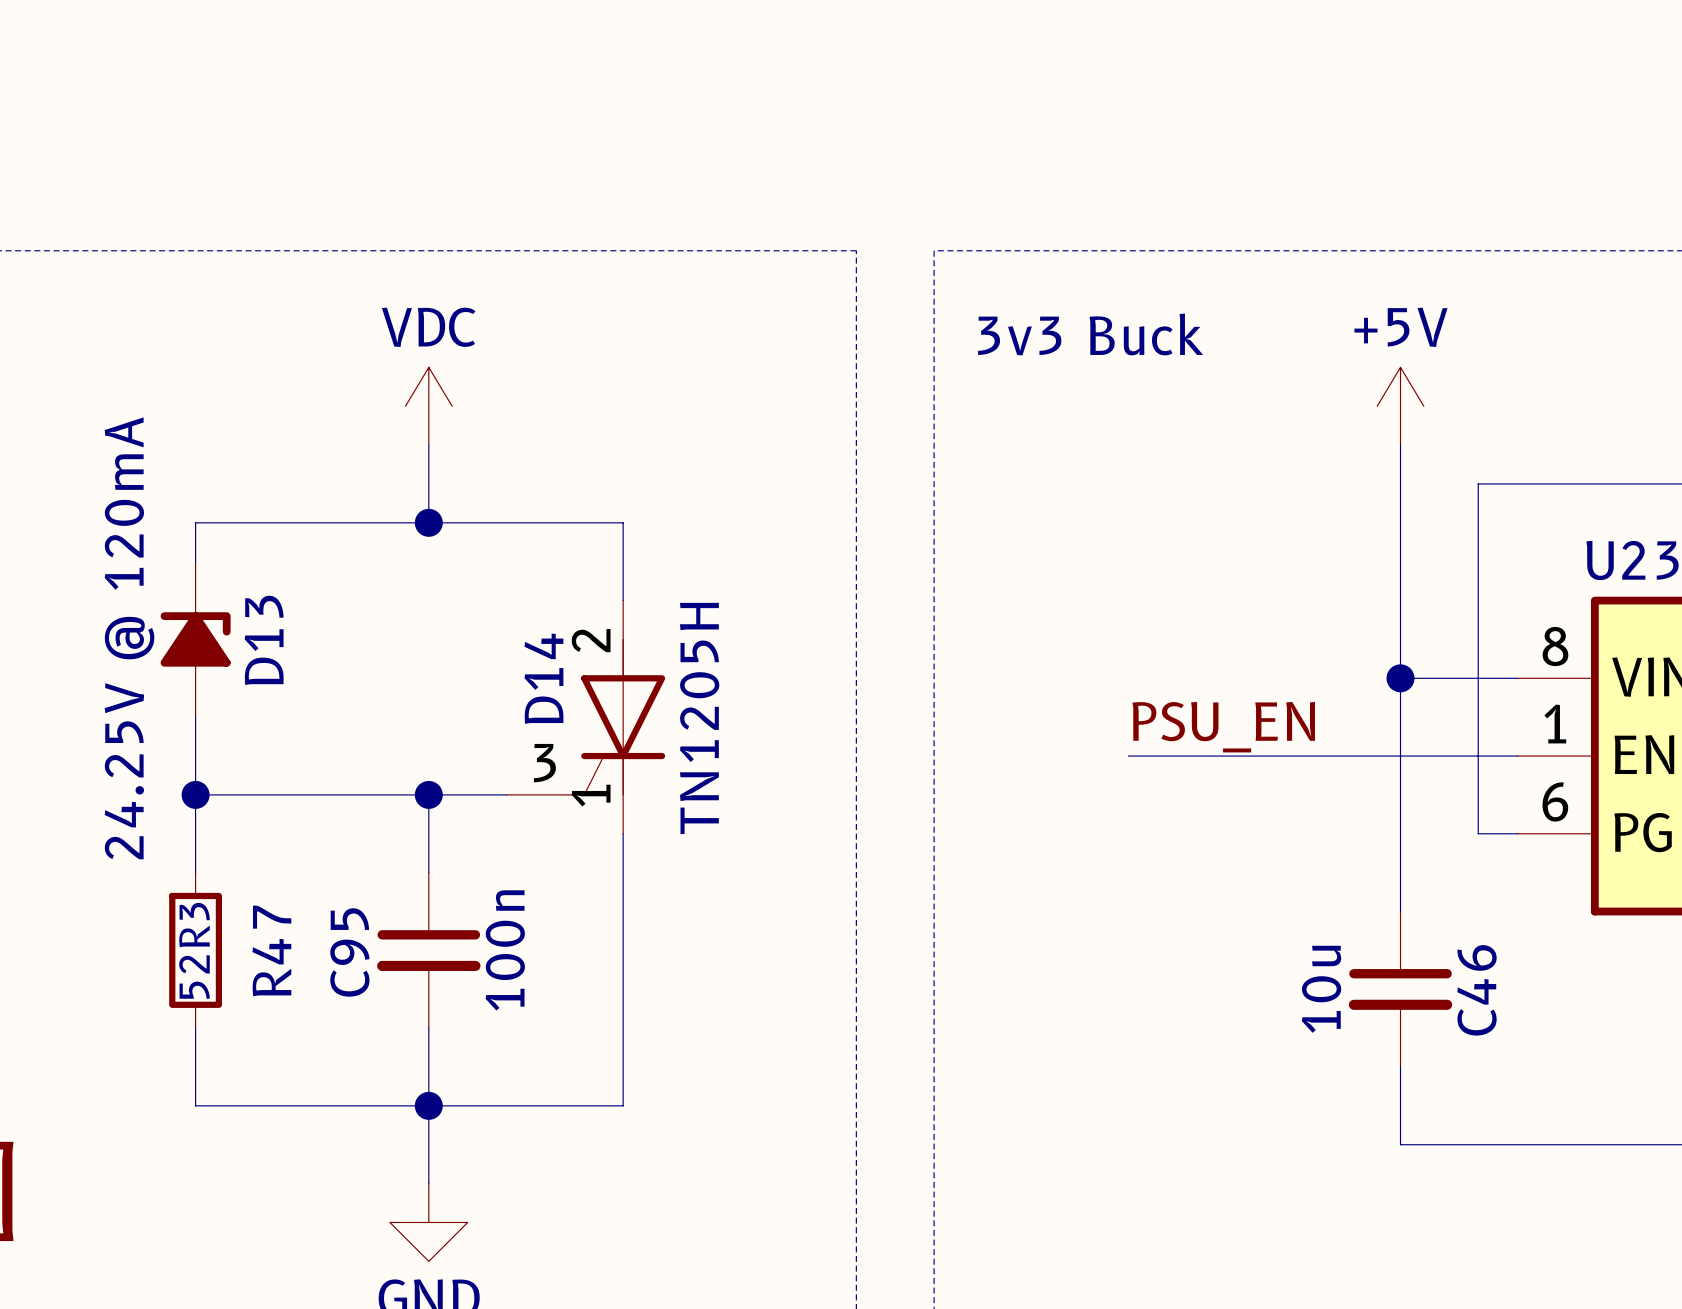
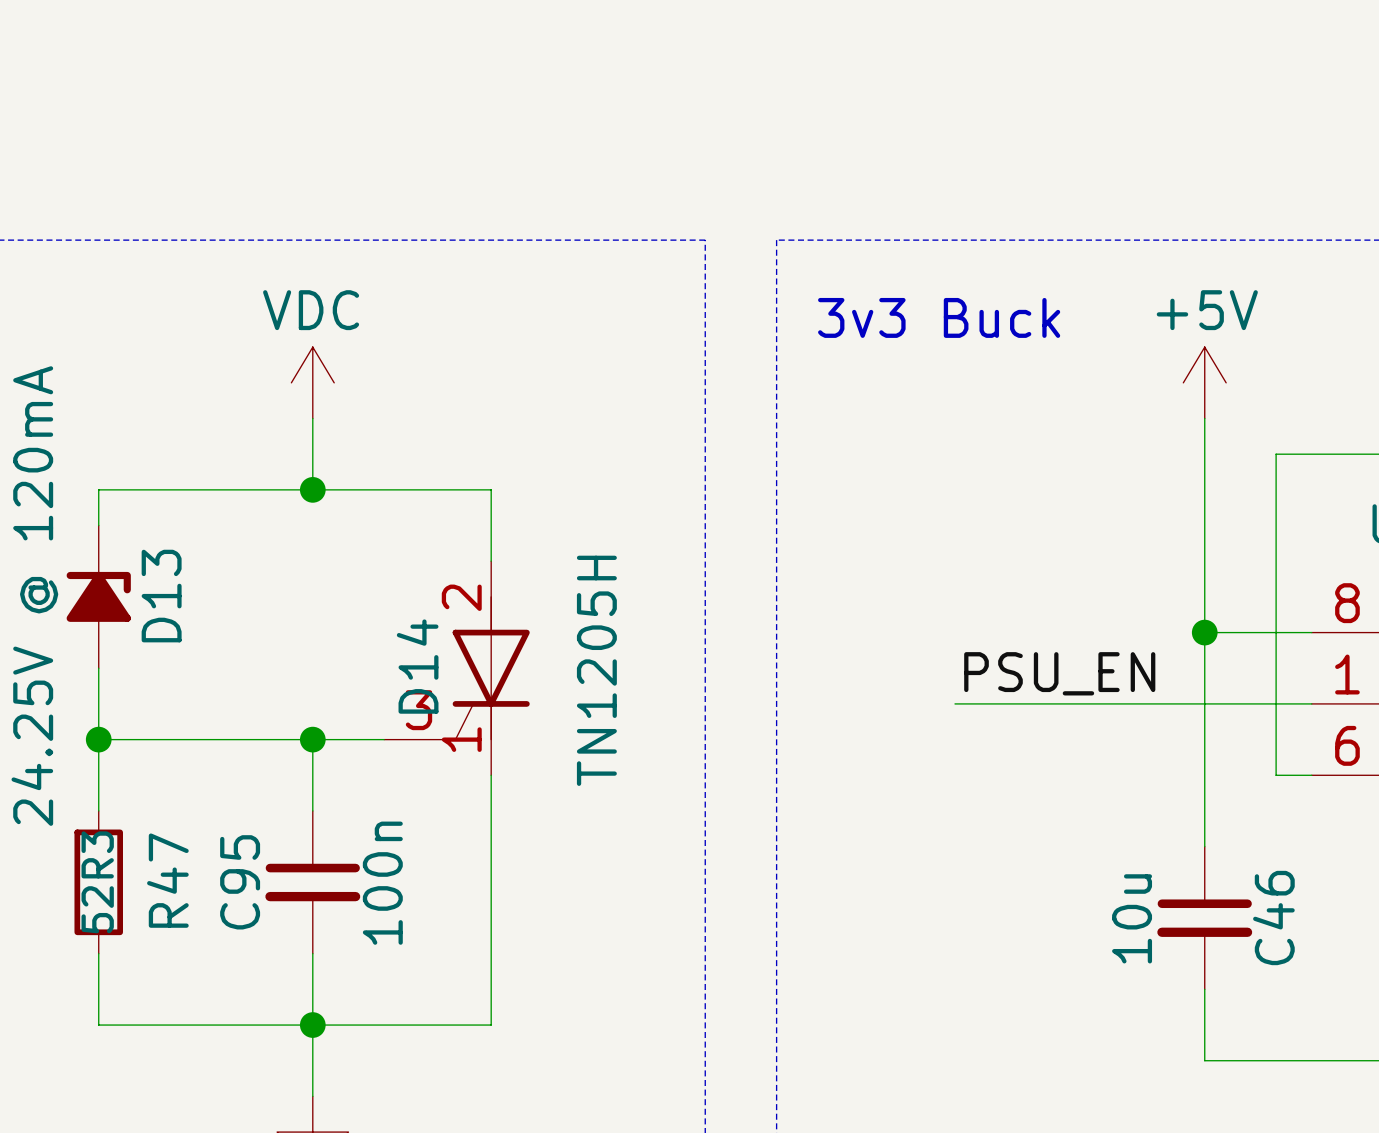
D14 name position: D14 (543, 678) -> D14 (417, 666)
D14 value position: TN1205H (699, 718) -> TN1205H (596, 670)

